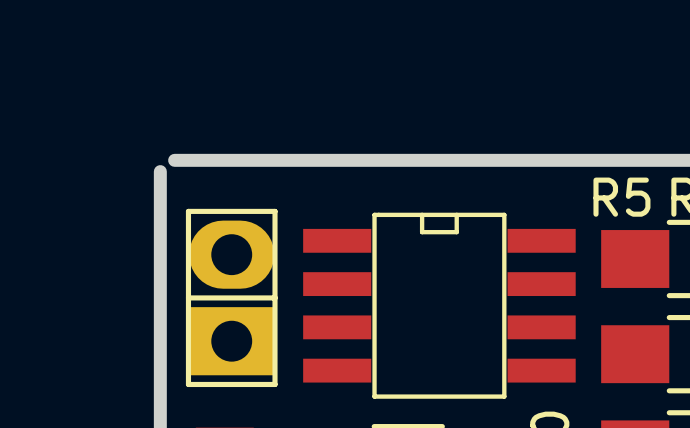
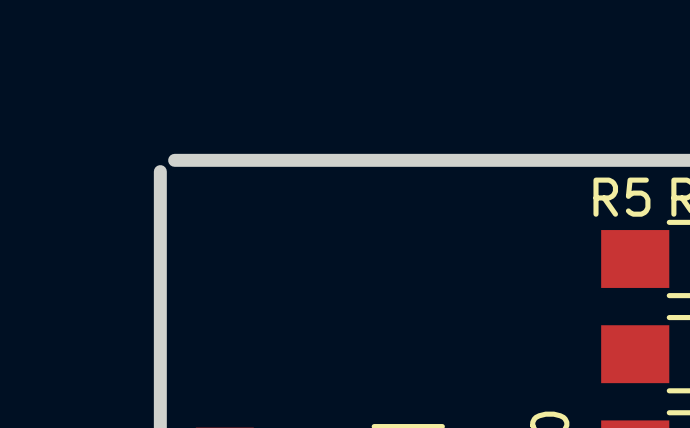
part: (231, 297) -> none
part: (439, 305) -> none

